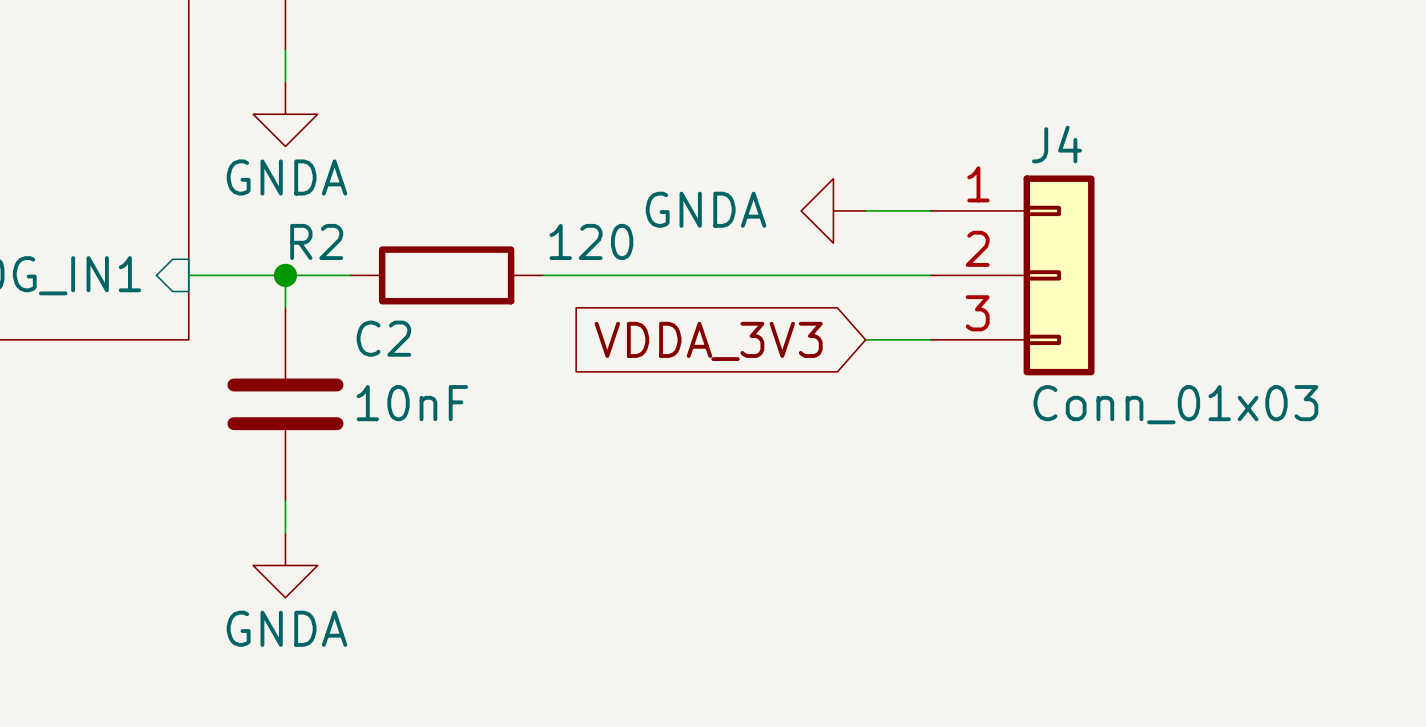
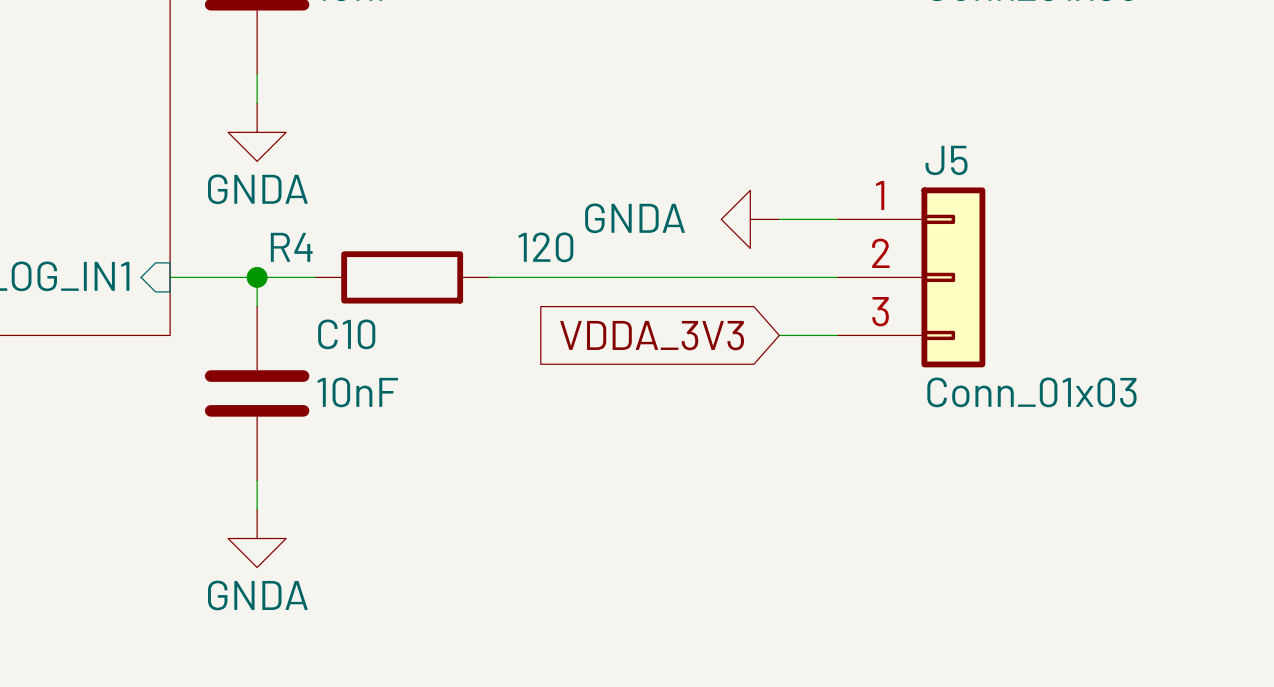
J4 name: J4 (1056, 144) -> J5 (946, 160)
R2 name: R2 (316, 241) -> R4 (291, 247)
C2 name: C2 (383, 338) -> C10 (346, 334)

